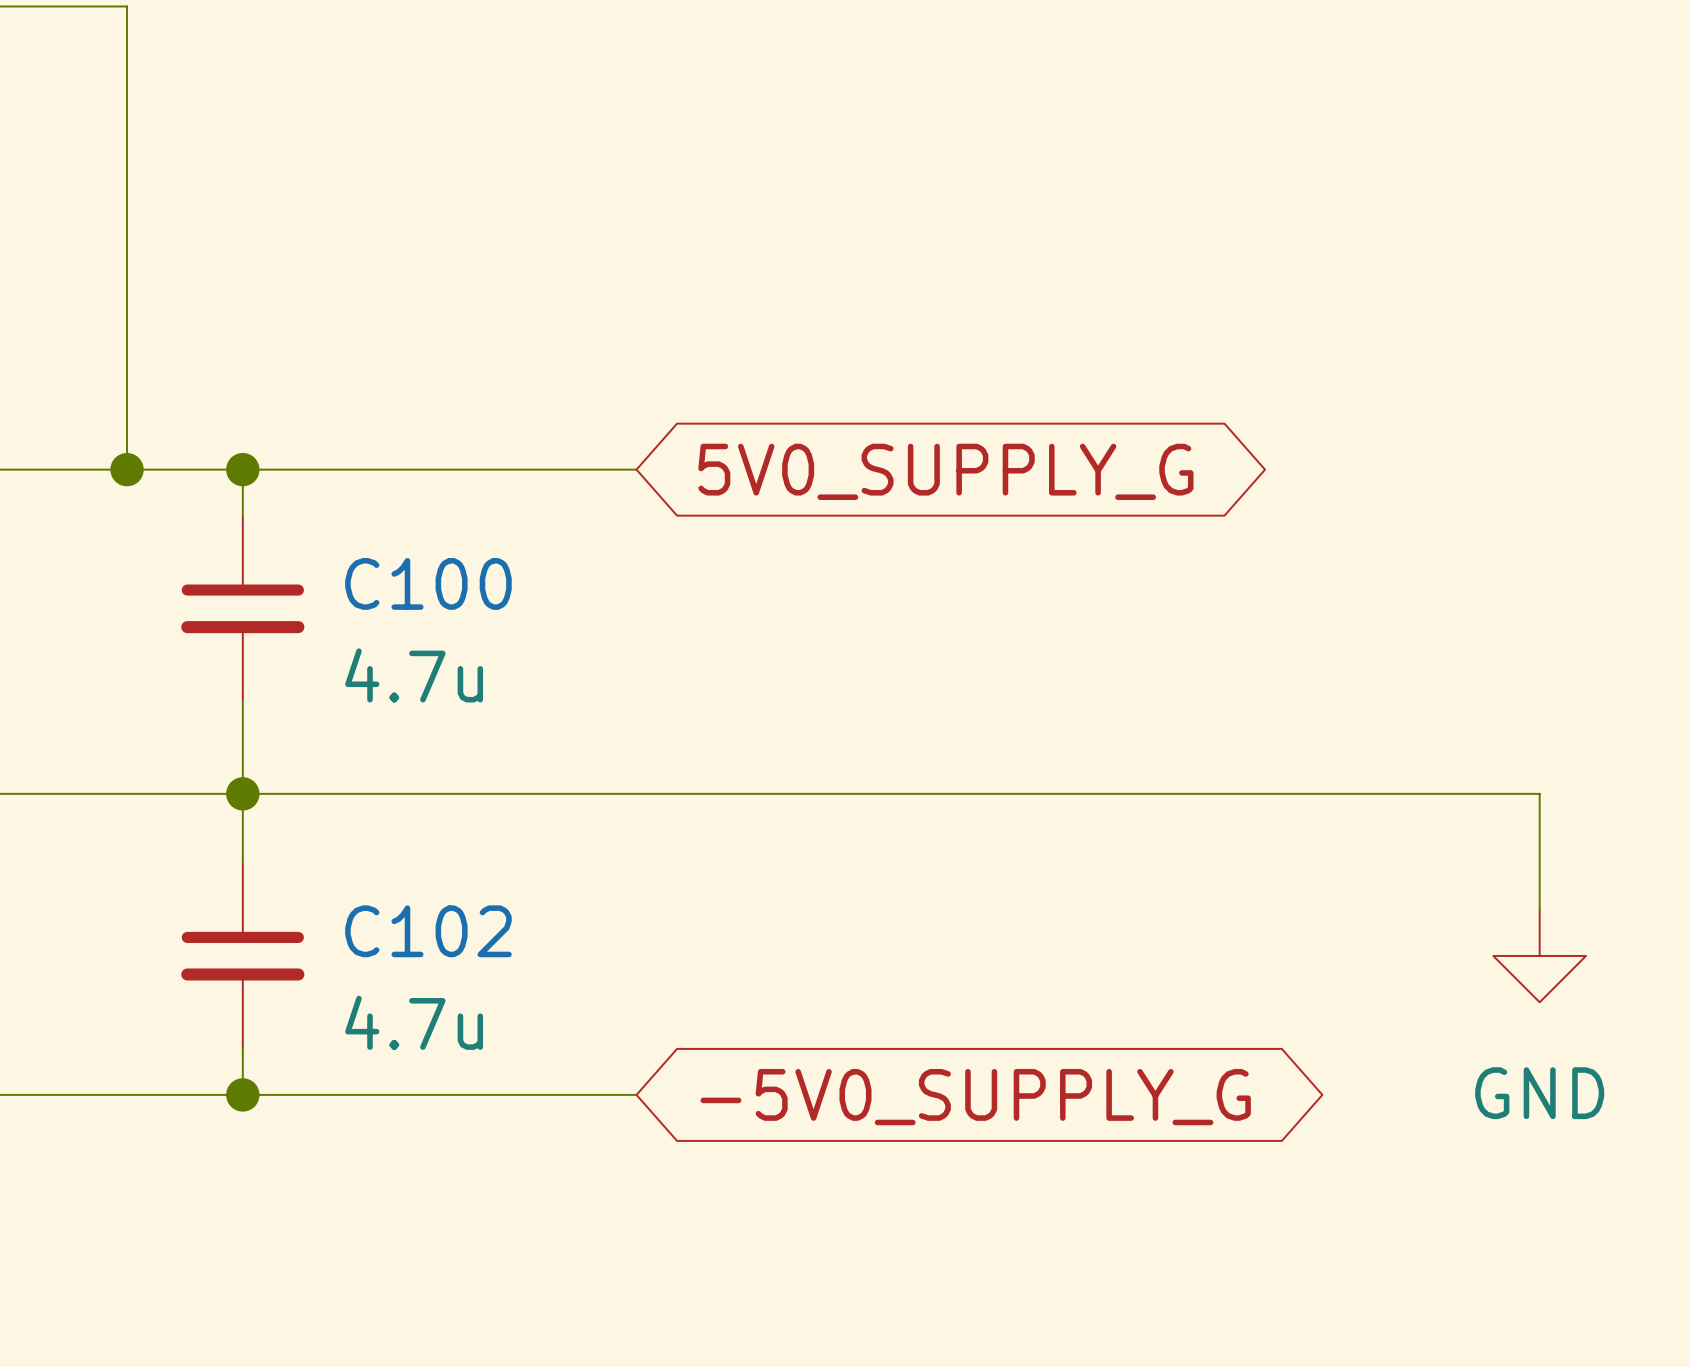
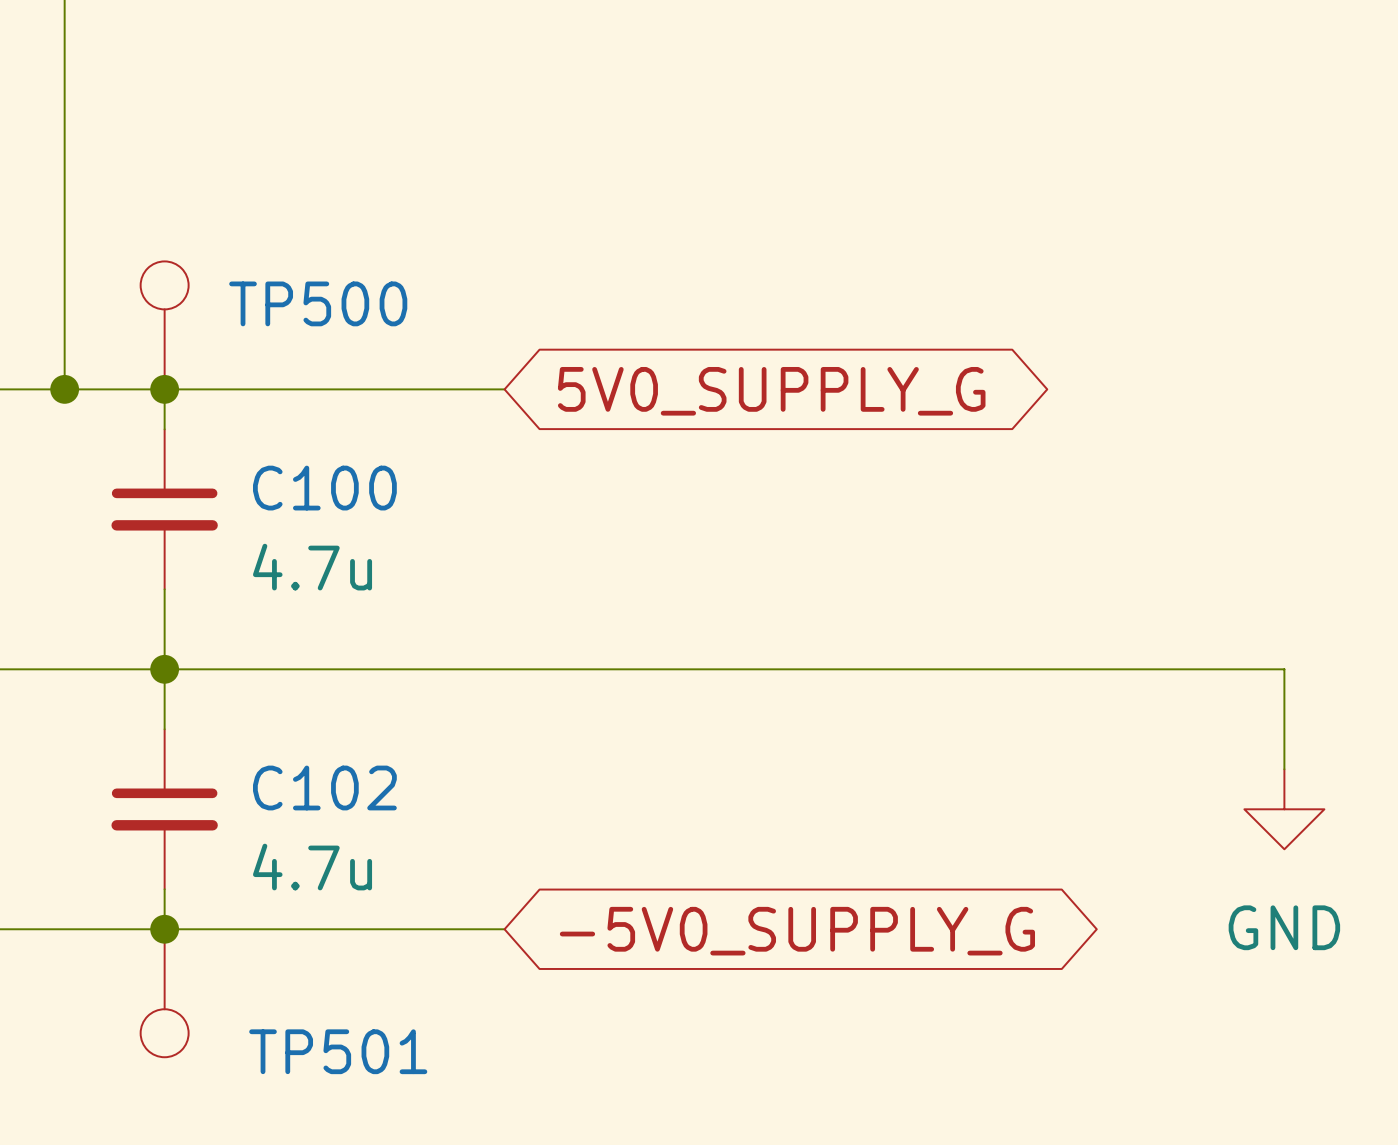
TP500: none -> (164, 325)
TP501: none -> (164, 993)

